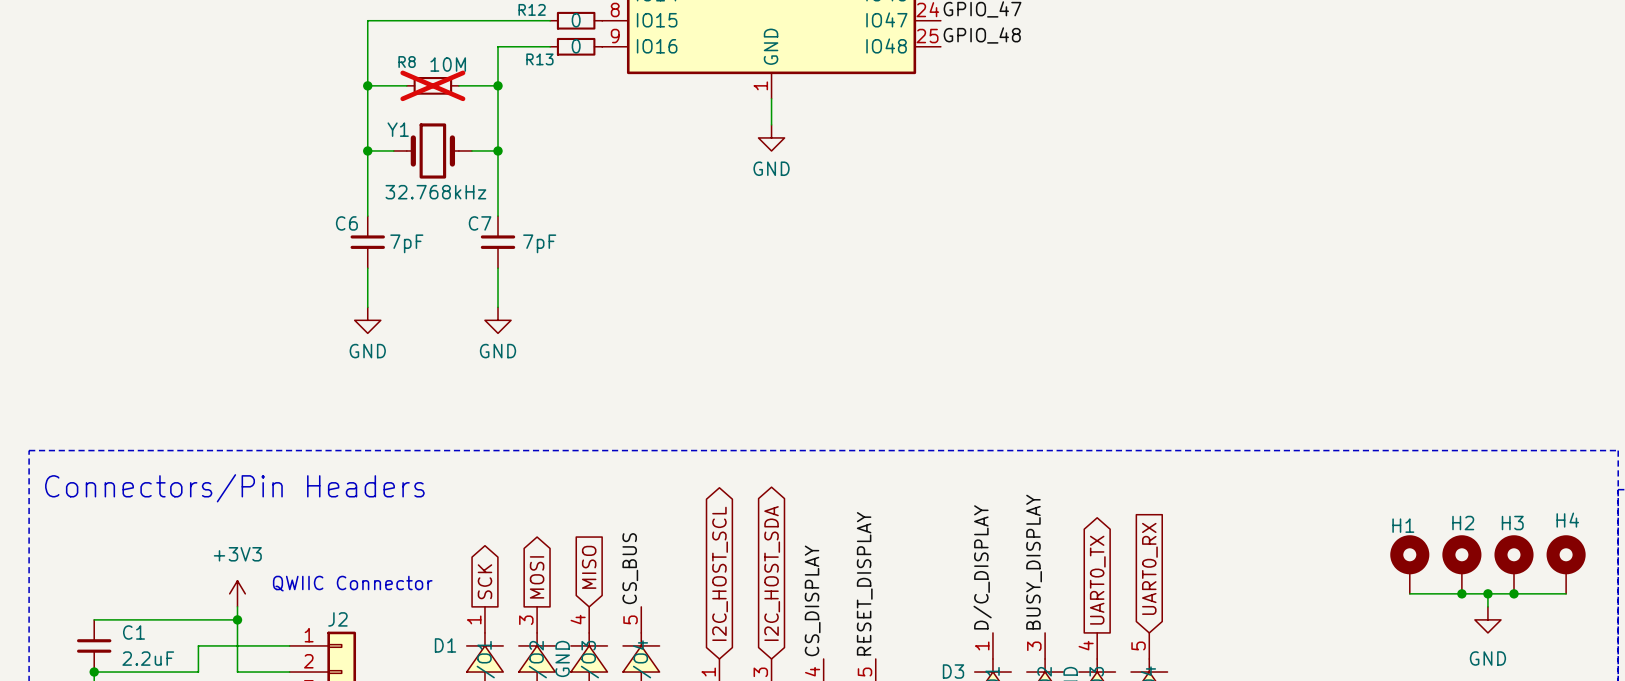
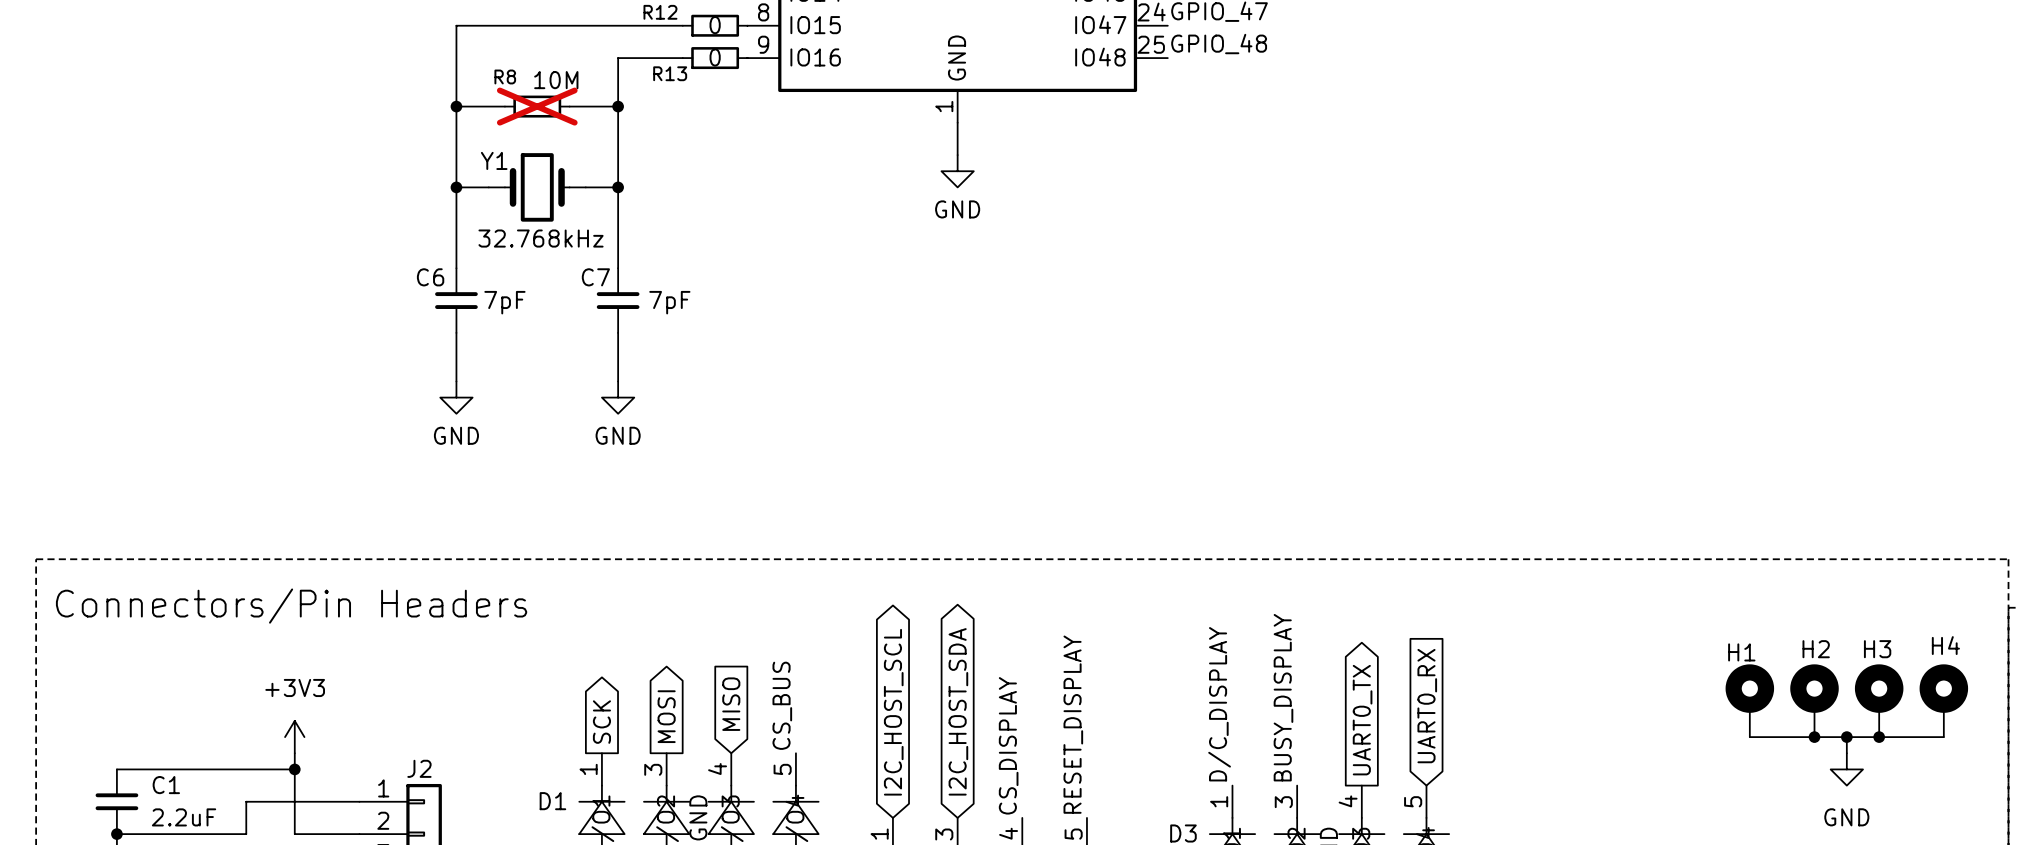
text: QWIIC Connector (352, 583) -> none

